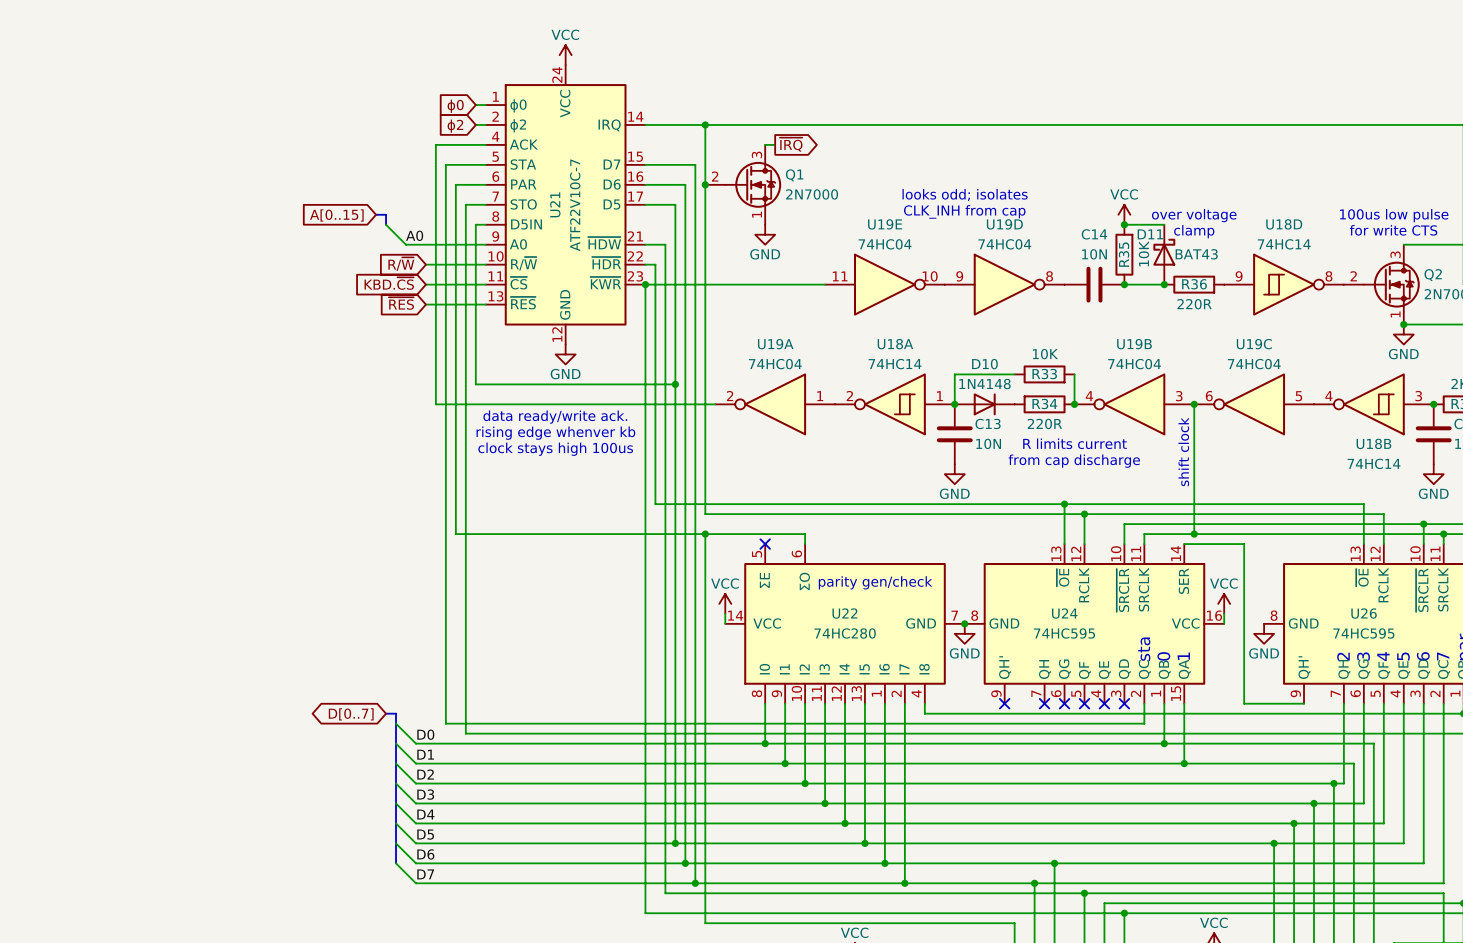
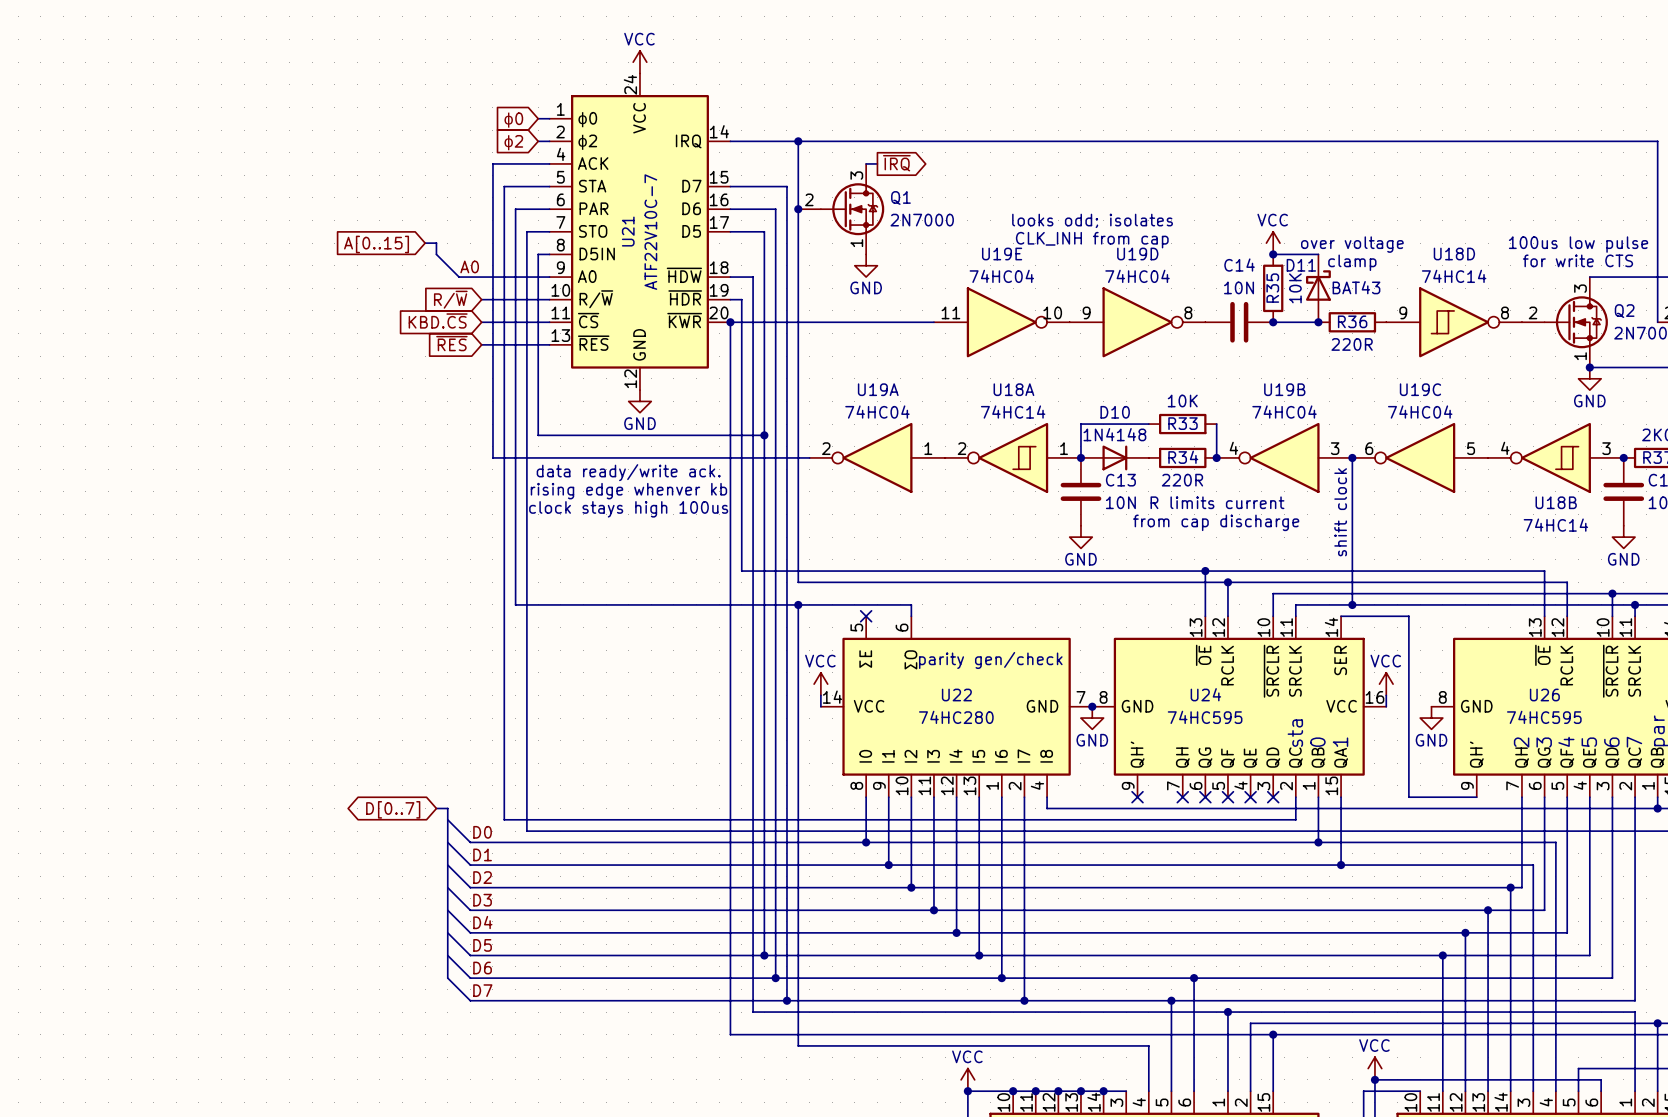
U21 pin number: 21 (635, 236) -> 18 (719, 267)
U21 pin number: 22 (635, 256) -> 19 (719, 290)
U21 pin number: 23 (635, 276) -> 20 (718, 312)

